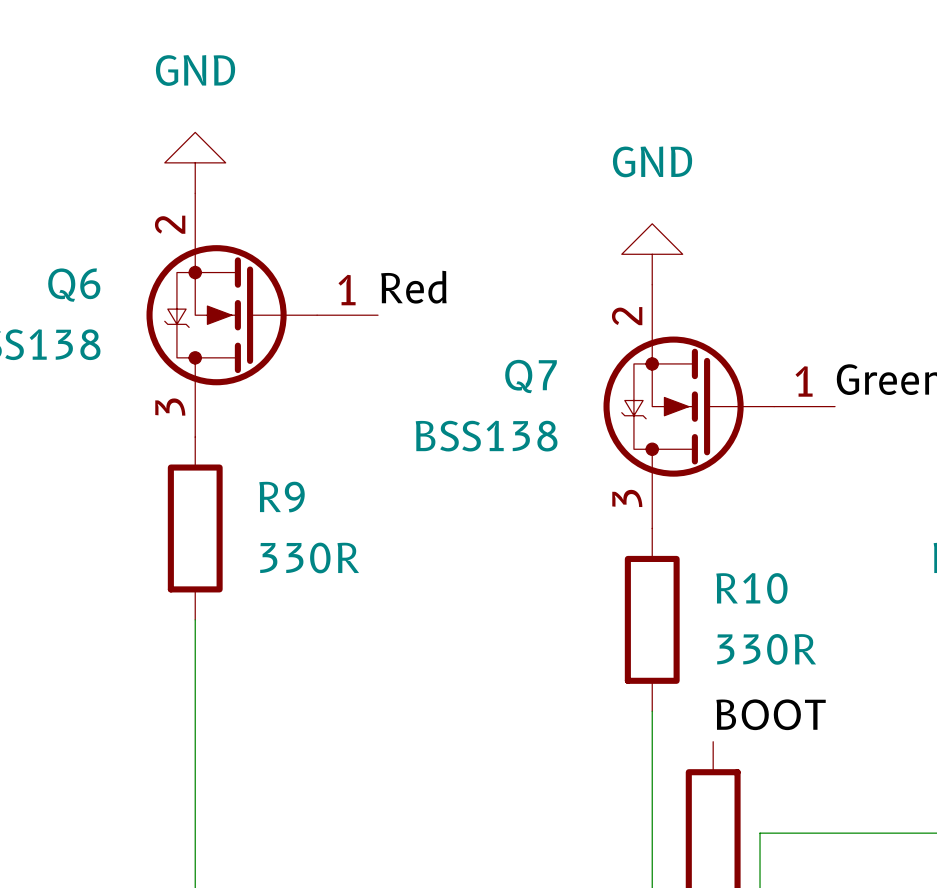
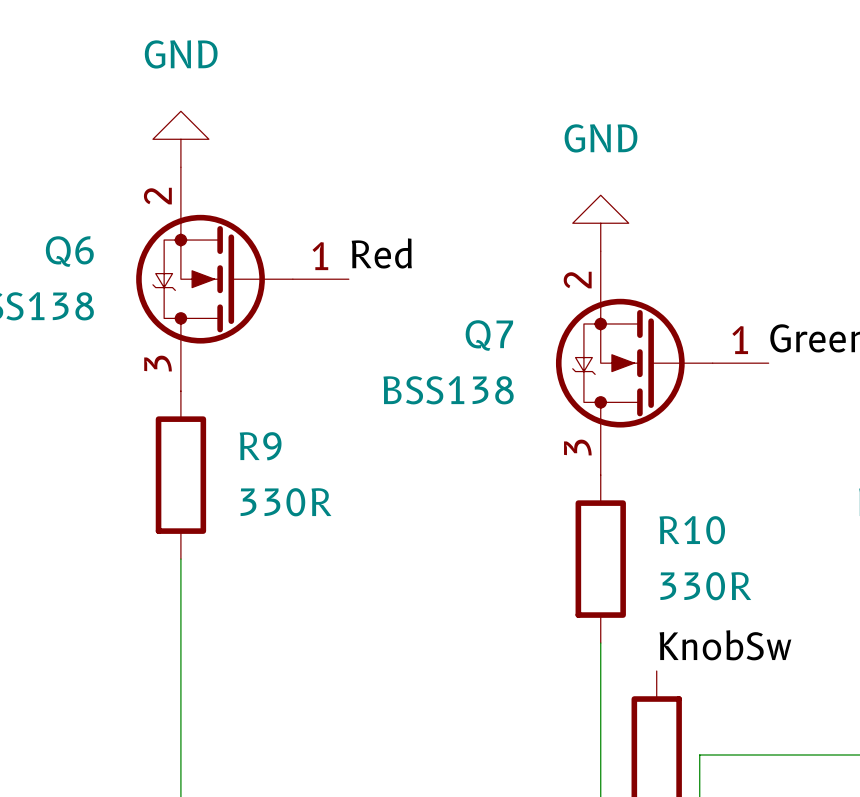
label: BOOT (771, 714) -> KnobSw (725, 645)

